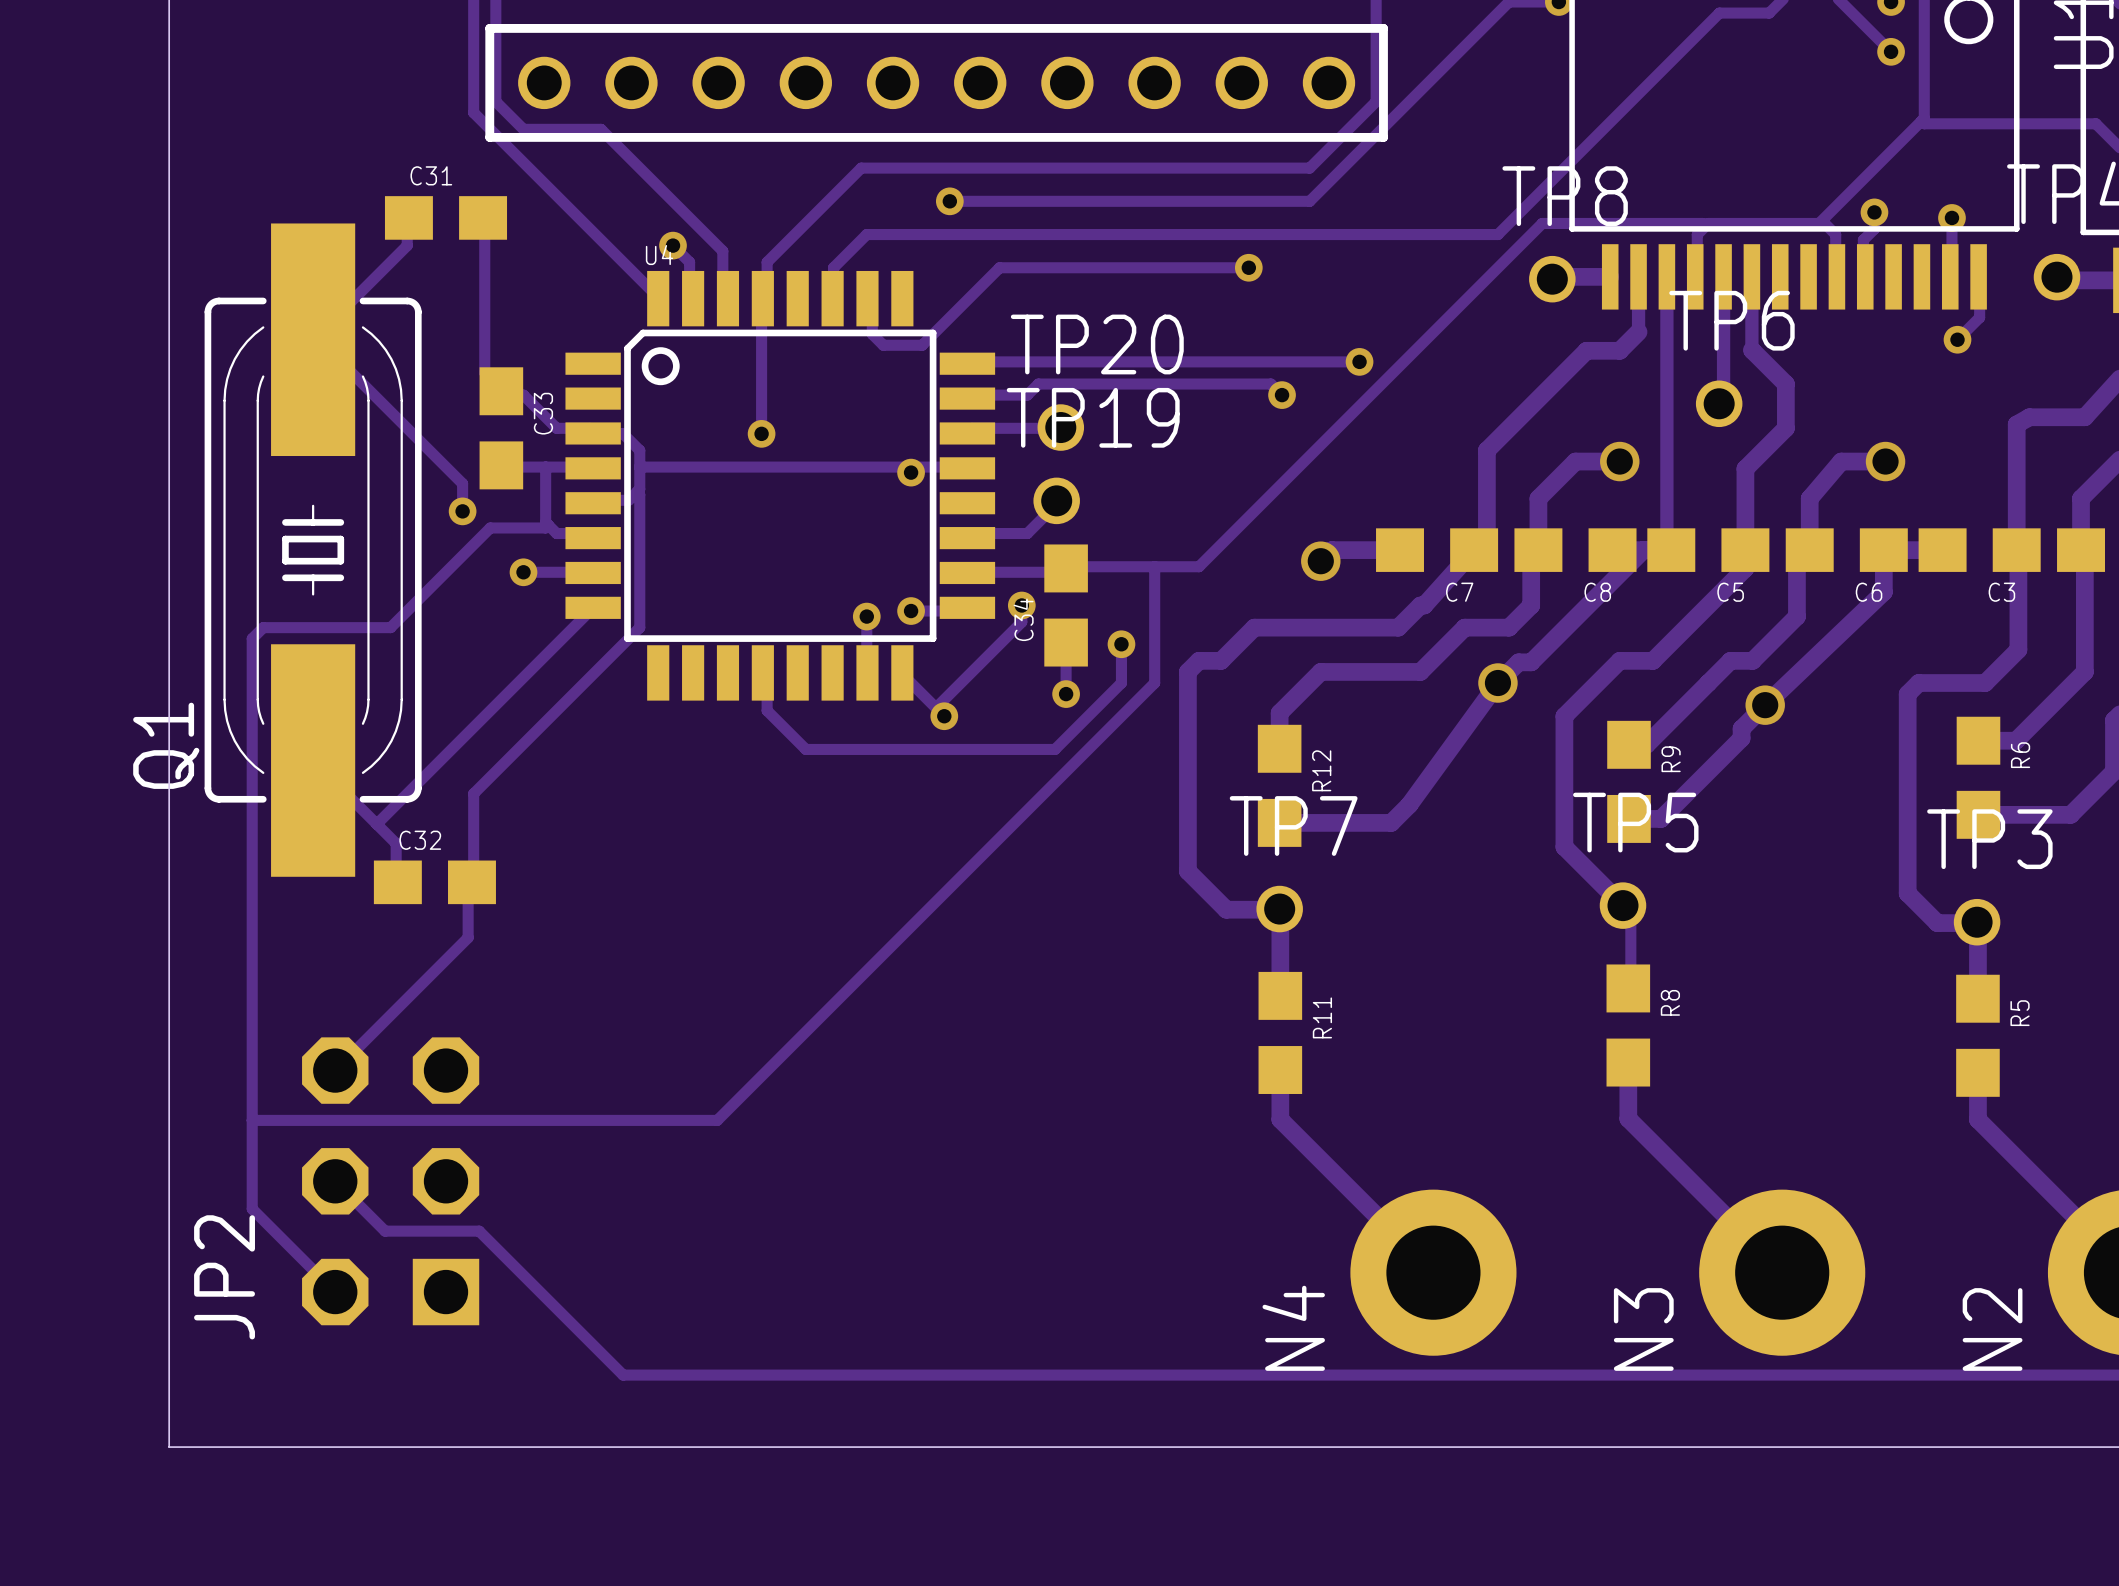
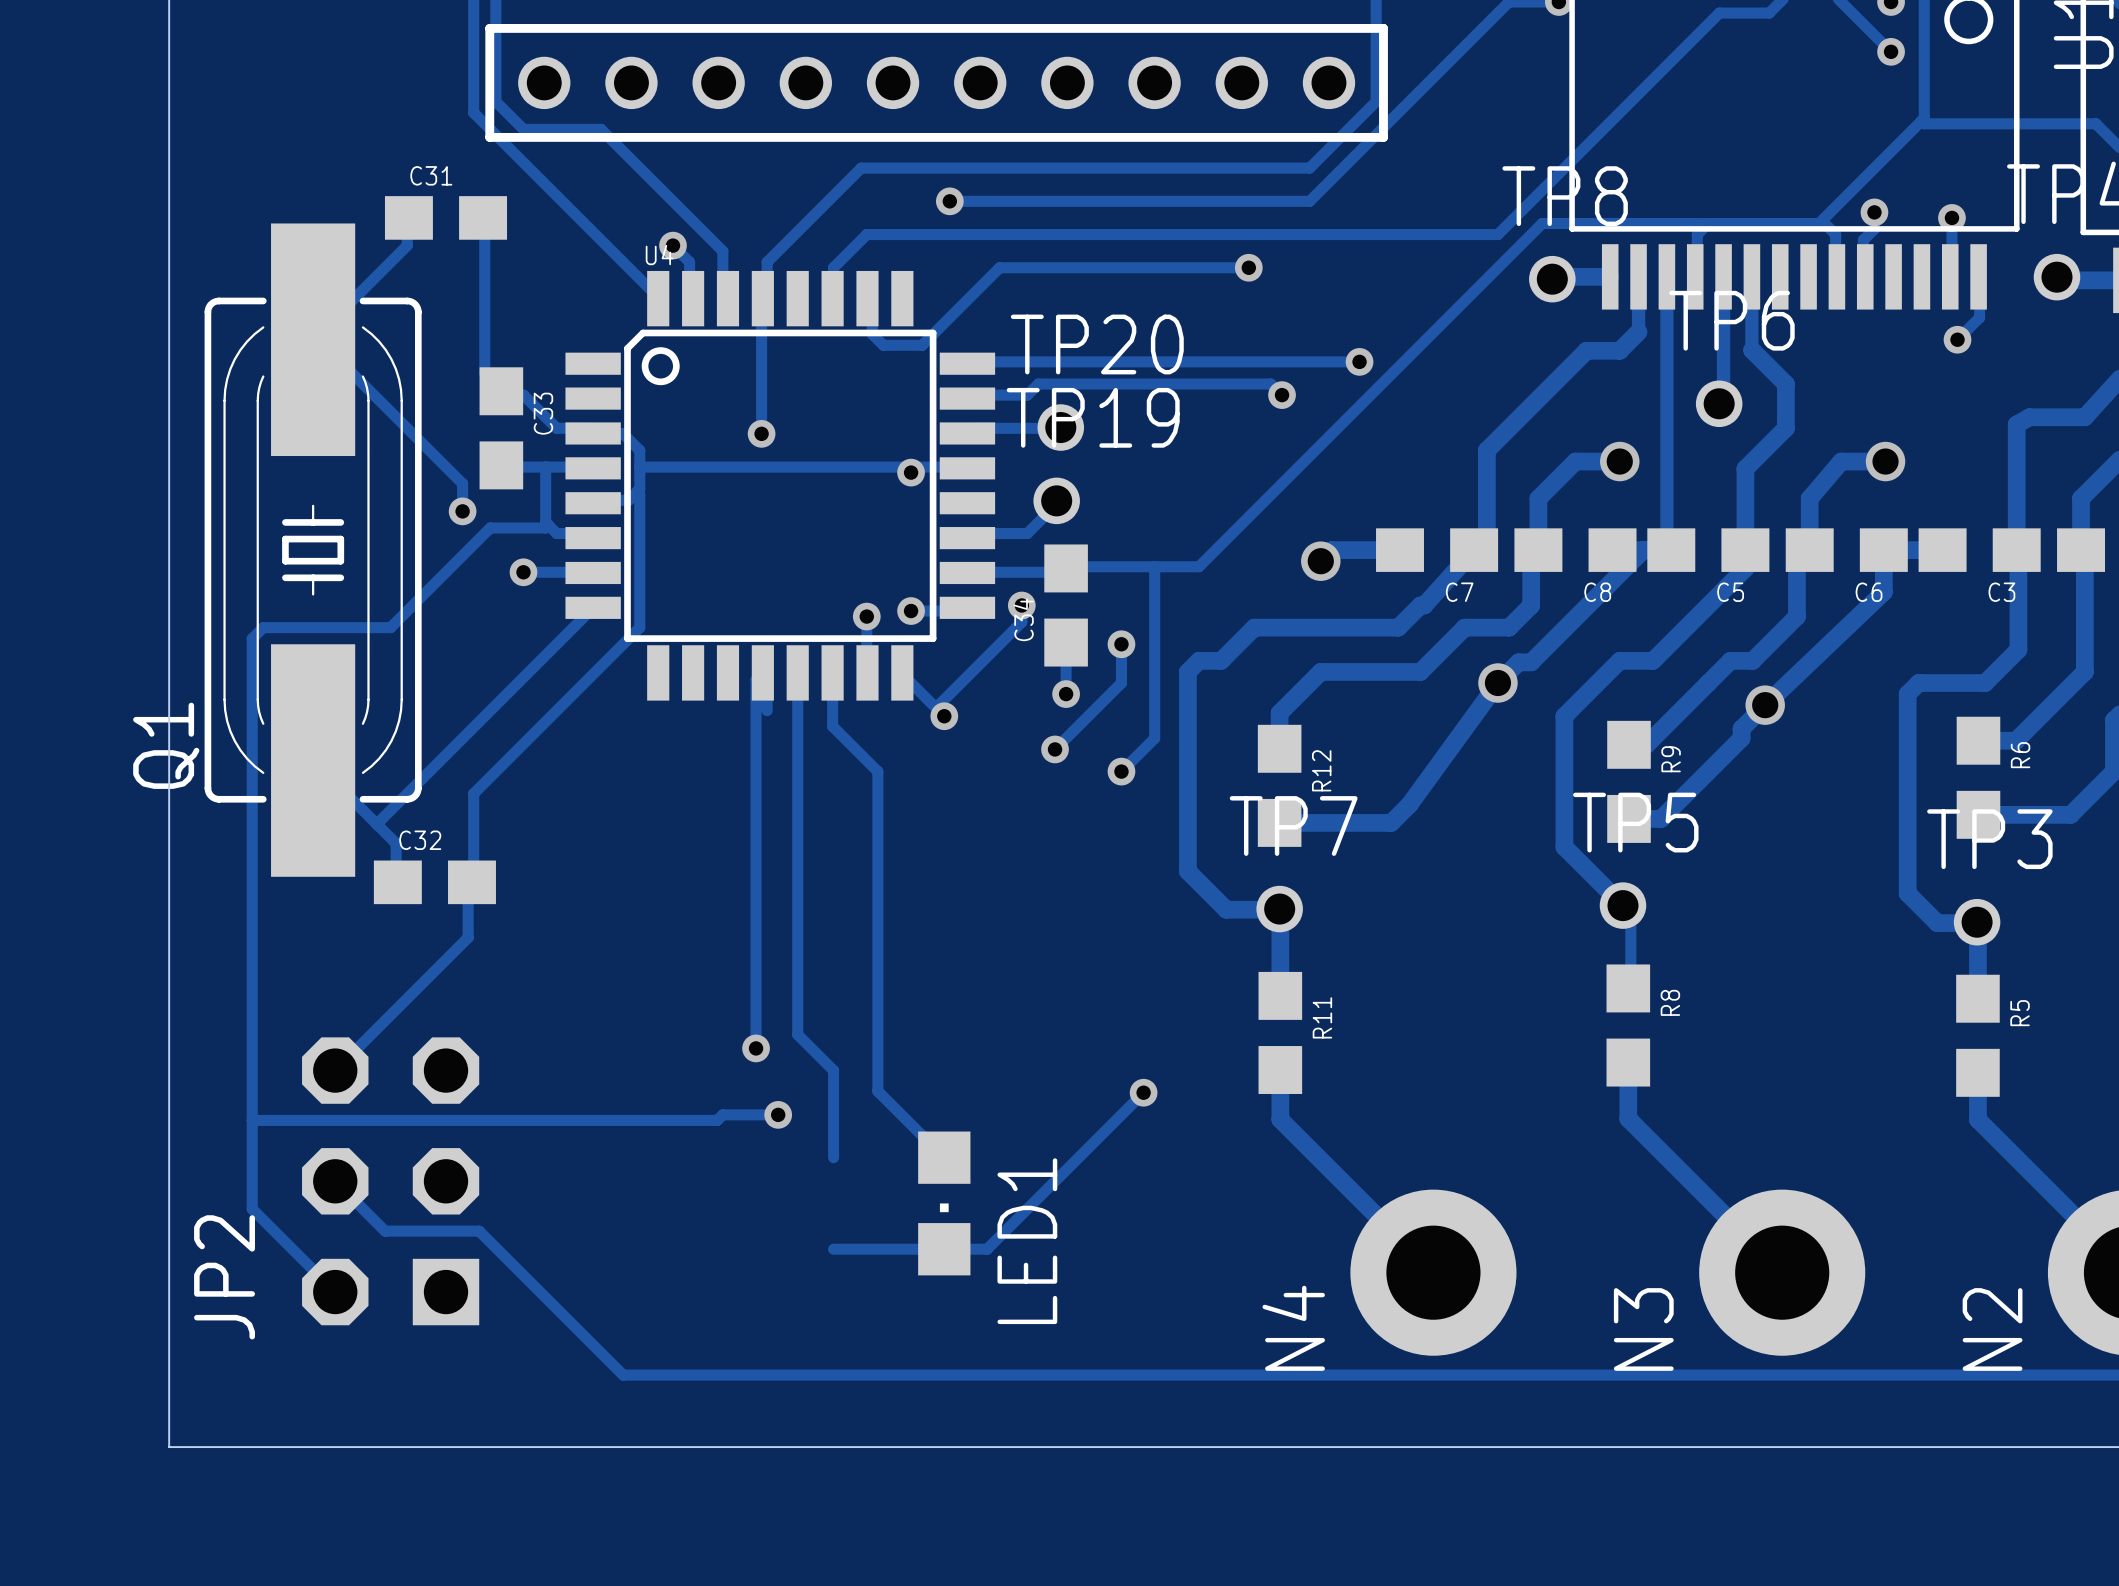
track: none -> (762, 672) (756, 679) (756, 1048)
track: none -> (797, 672) (797, 1034) (833, 1070) (833, 1157)
track: none -> (832, 672) (832, 726) (877, 771) (877, 1091) (944, 1157)
track: (1154, 683) (722, 1114) -> (1154, 683) (1154, 738) (1121, 771)
track: (767, 710) (805, 749) (1055, 749) -> none
via: none -> (1055, 749)
via: none -> (1121, 771)
via: none -> (756, 1048)
track: none -> (1143, 1092) (987, 1249) (833, 1249)
via: none -> (1143, 1092)
track: none -> (722, 1114) (778, 1114)
via: none -> (778, 1114)
LED1: none -> (944, 1203)

